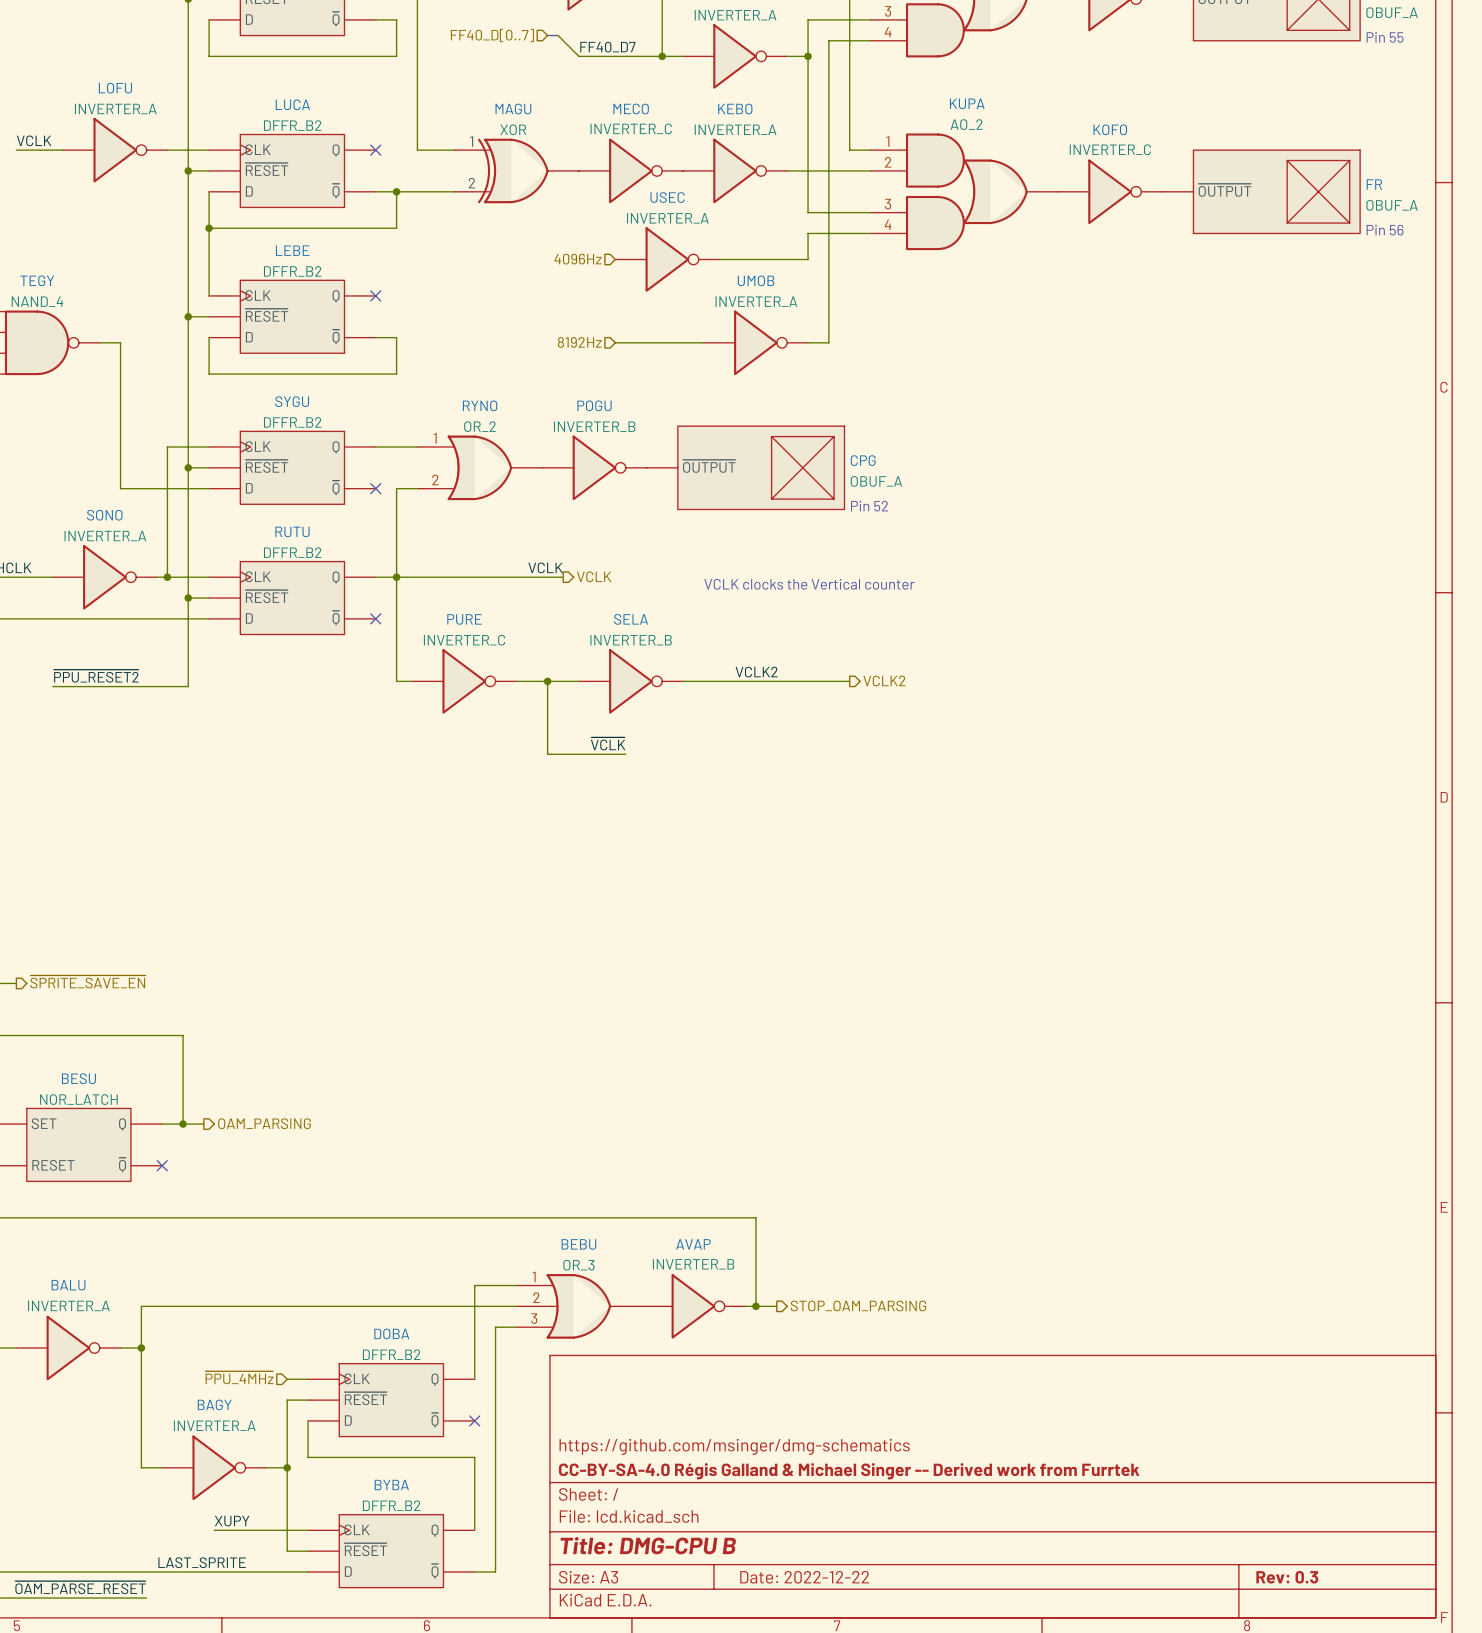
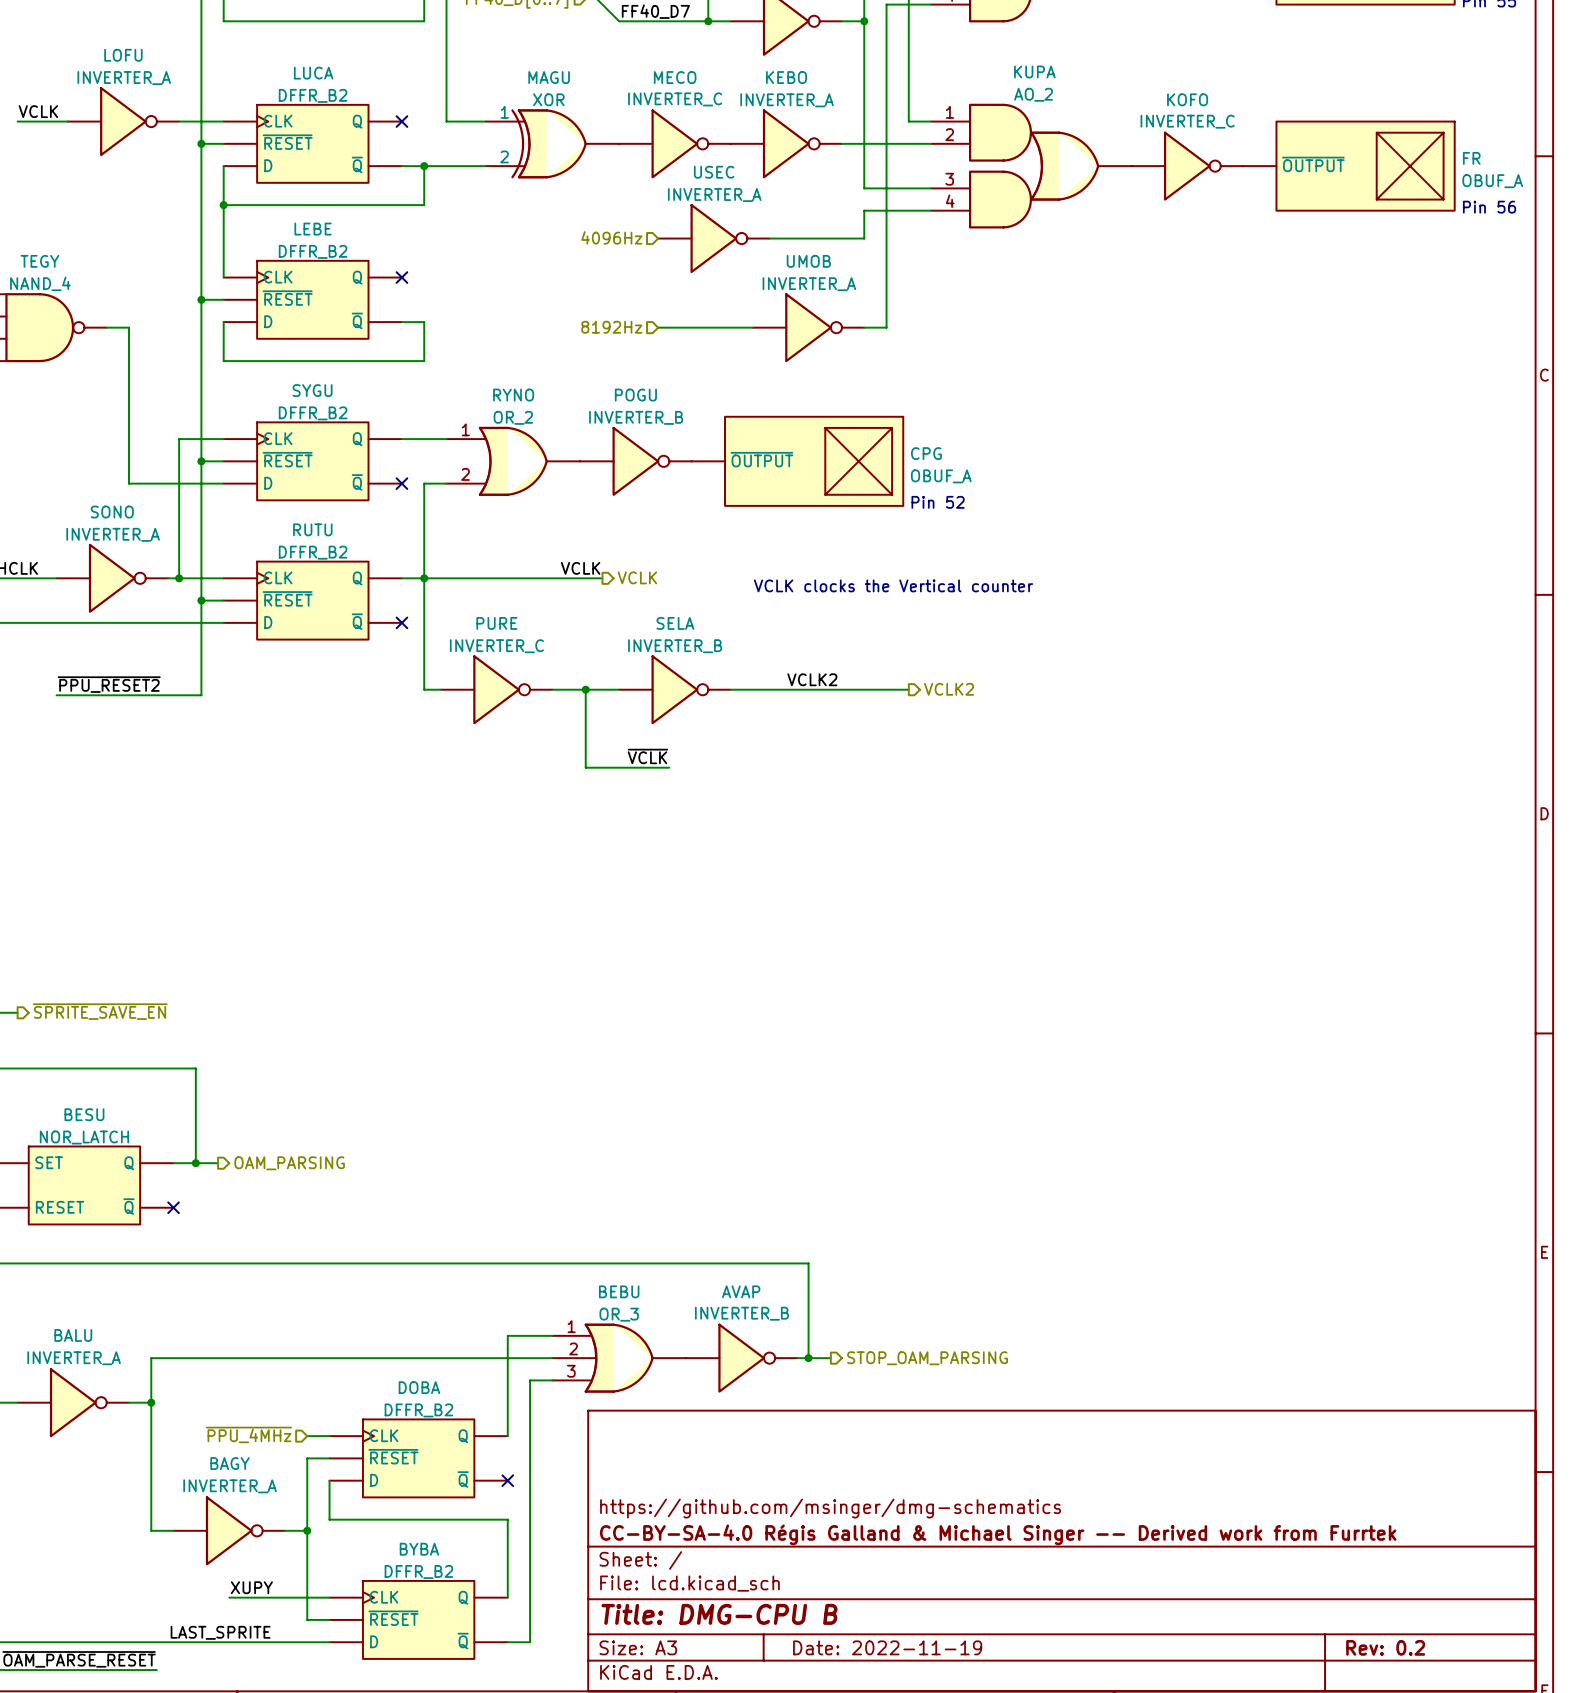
title block: Date: 2022-12-22 (804, 1577) -> Date: 2022-11-19 (887, 1647)
title block: Rev: 0.3 (1287, 1577) -> Rev: 0.2 (1385, 1647)

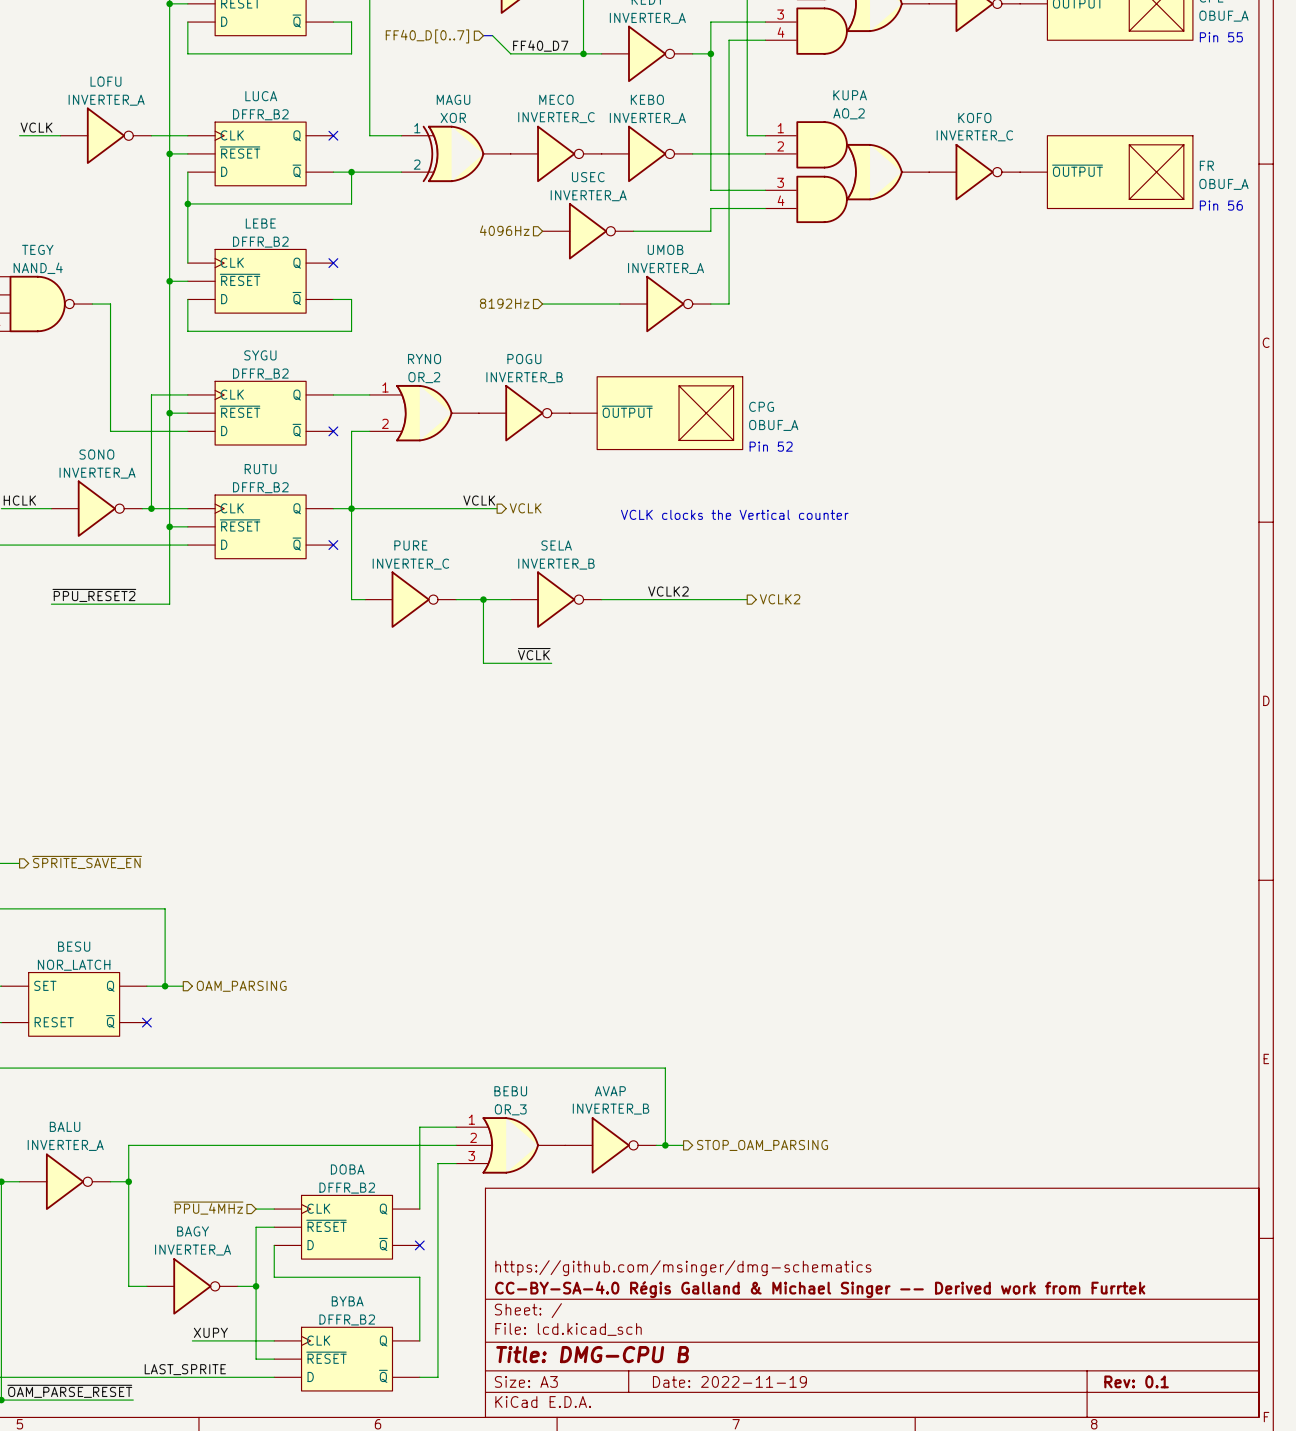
title block: Rev: 0.2 (1385, 1647) -> Rev: 0.1 (1136, 1381)

